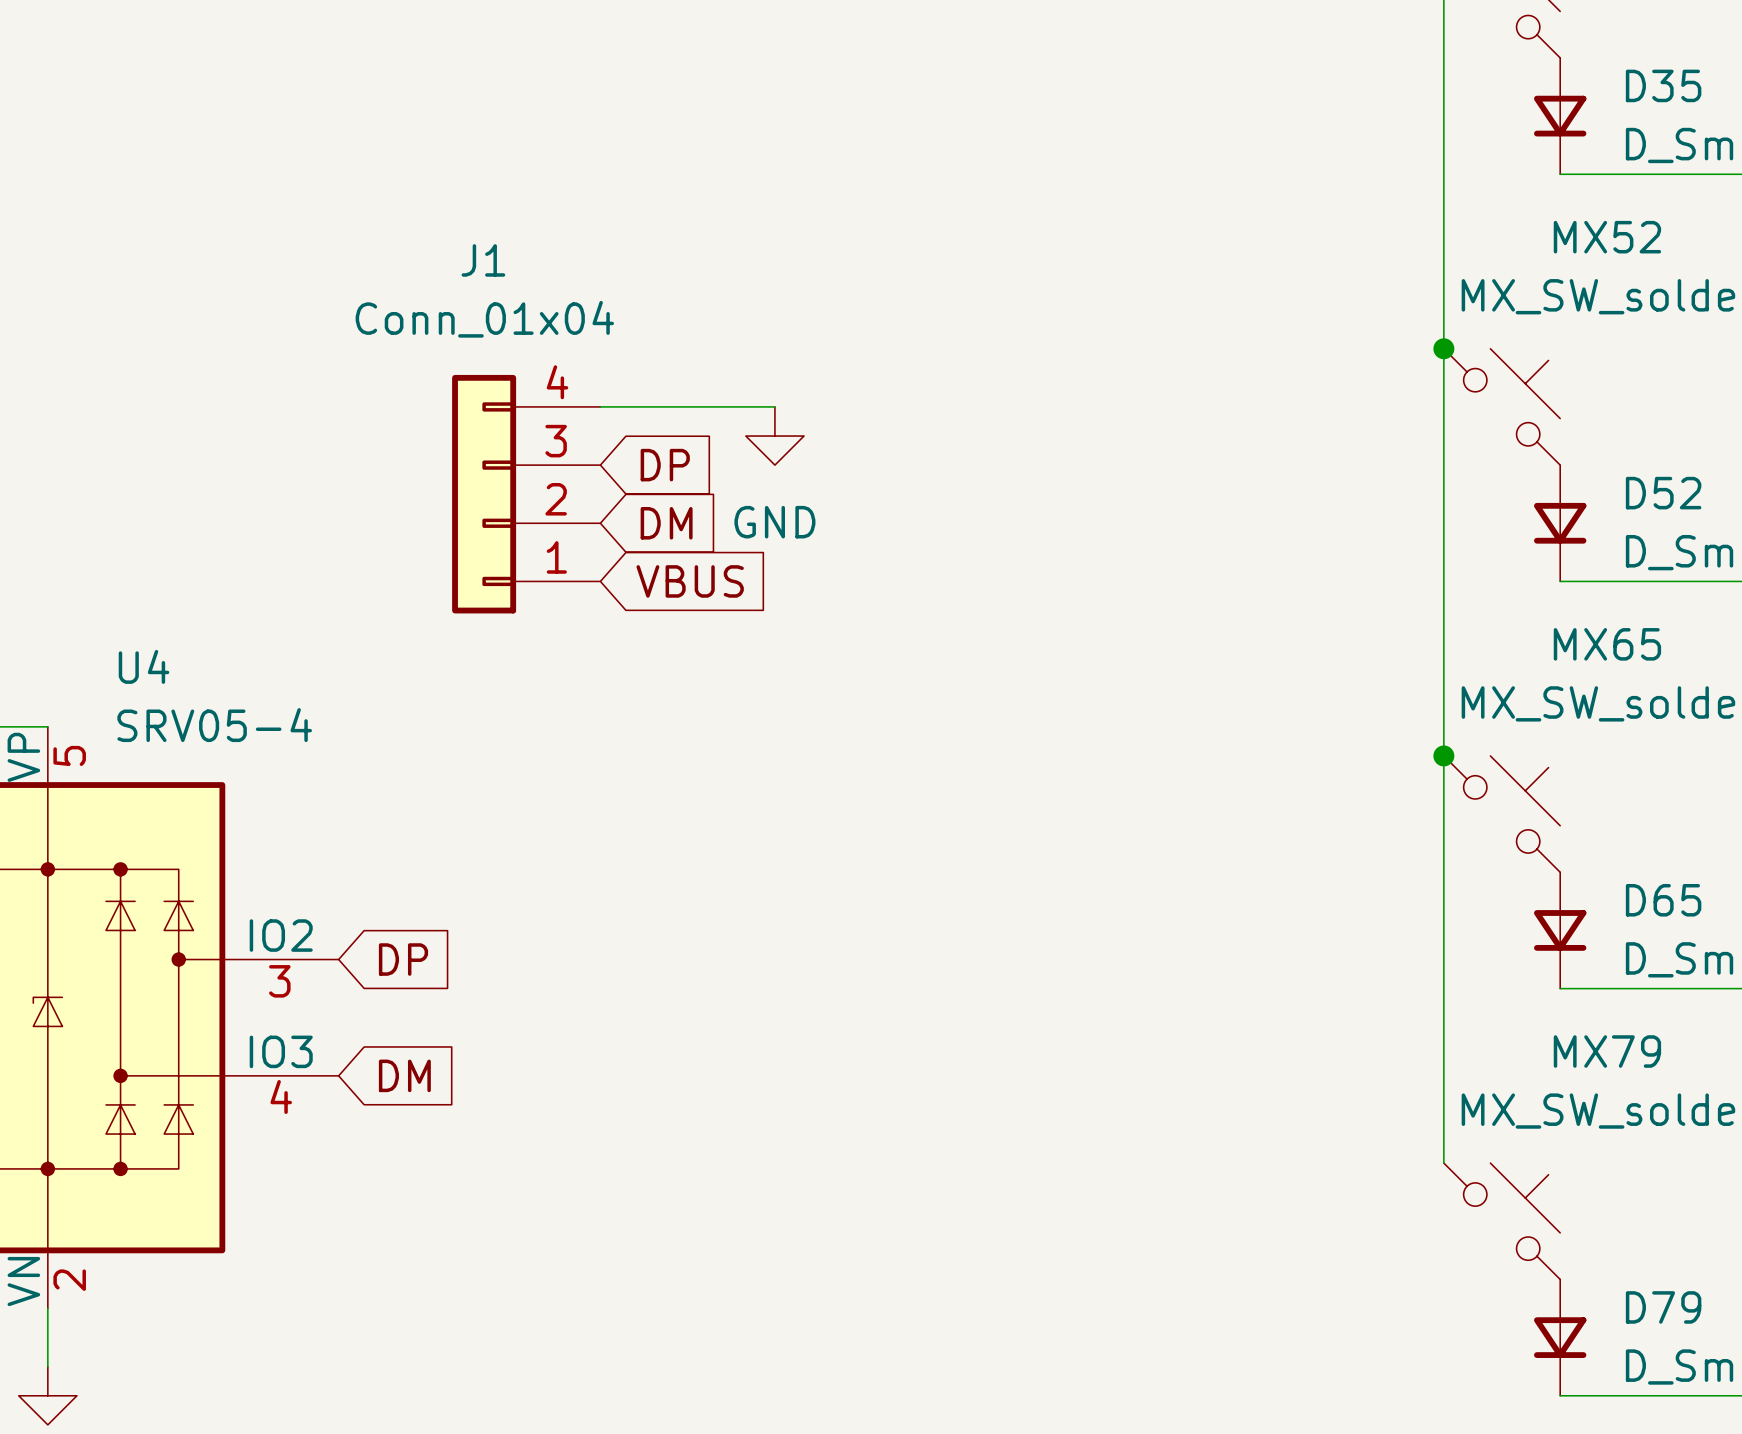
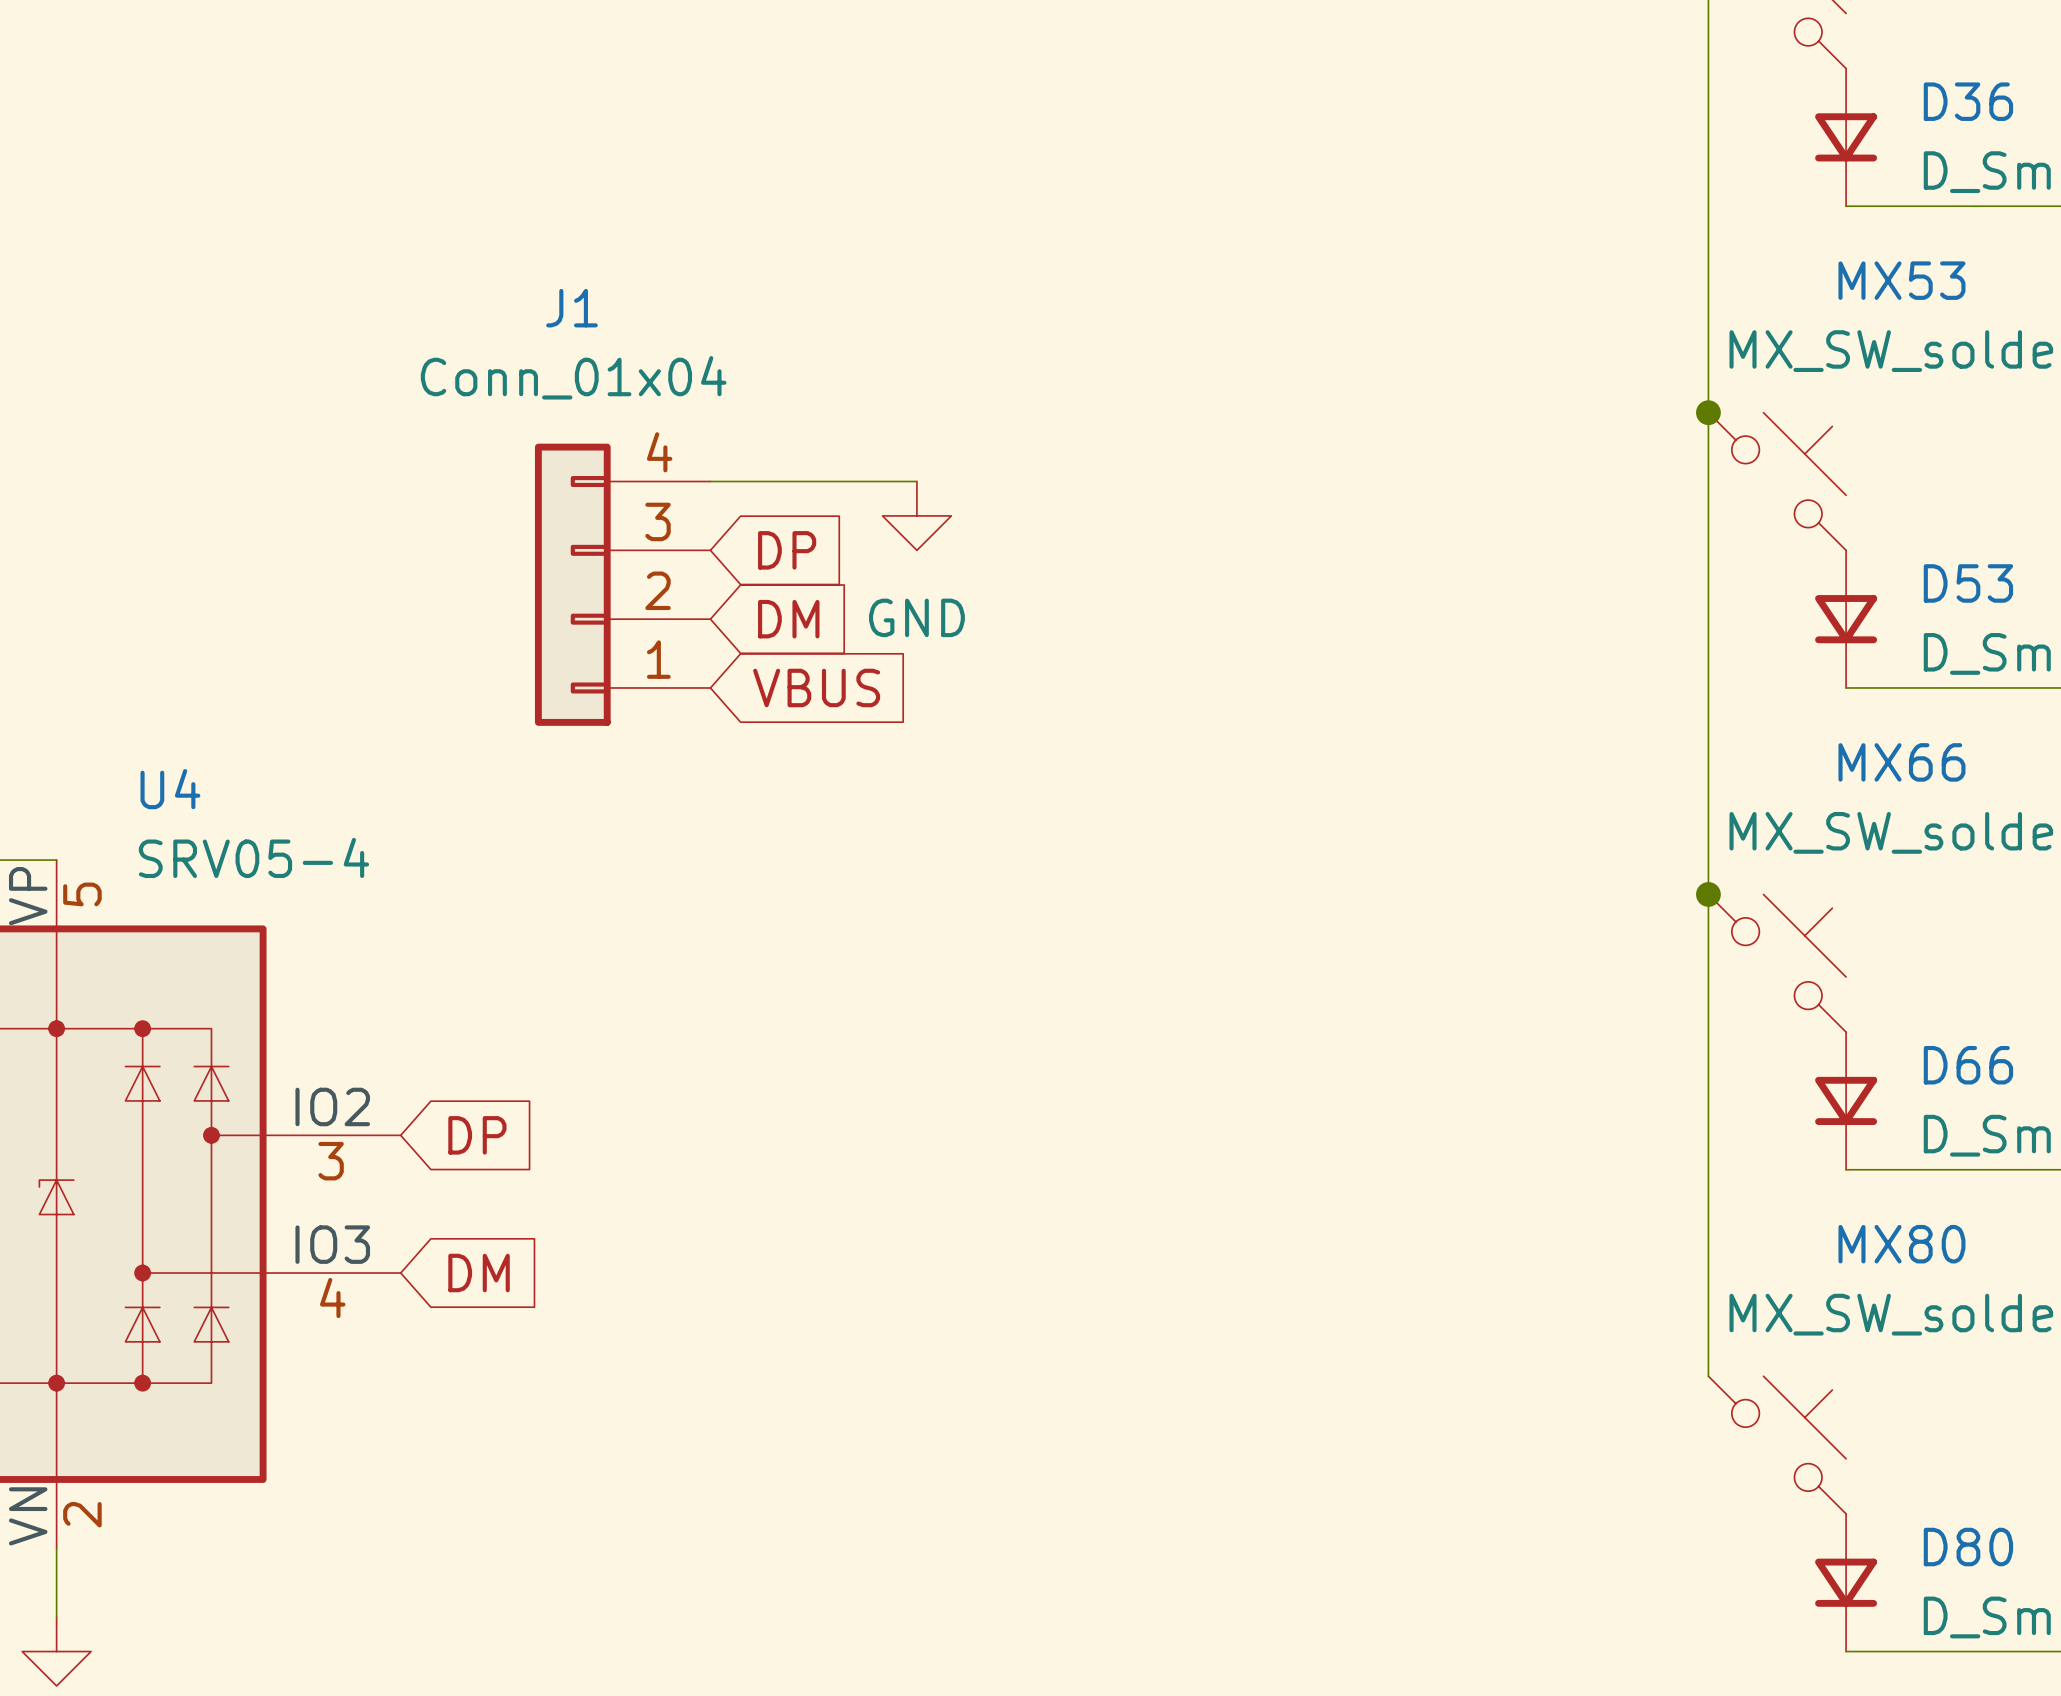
D35 name: D35 (1663, 85) -> D36 (1968, 101)
MX52 name: MX52 (1607, 237) -> MX53 (1901, 280)
D52 name: D52 (1663, 493) -> D53 (1968, 583)
MX65 name: MX65 (1607, 644) -> MX66 (1901, 762)
D65 name: D65 (1663, 900) -> D66 (1968, 1065)
MX79 name: MX79 (1607, 1051) -> MX80 (1901, 1244)
D79 name: D79 (1663, 1307) -> D80 (1968, 1547)

